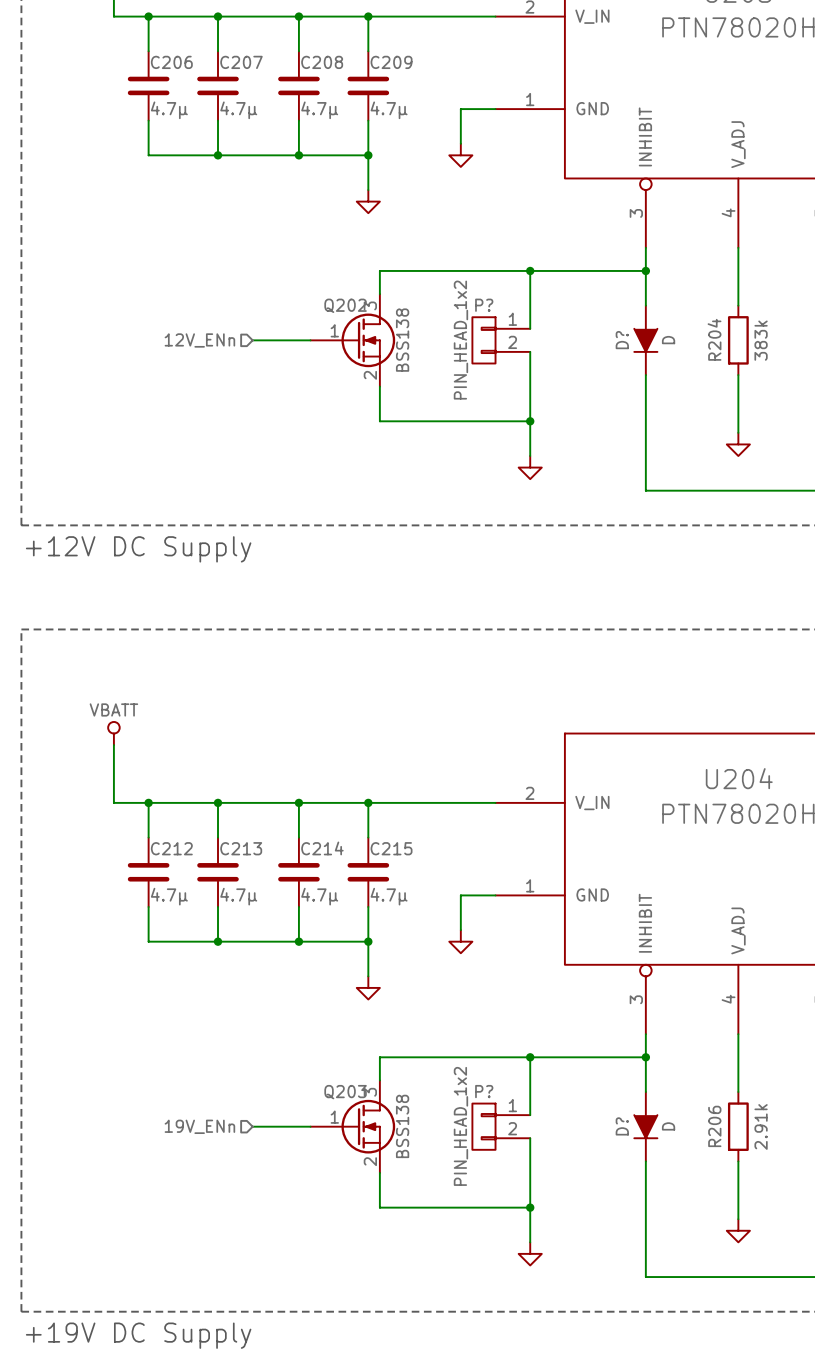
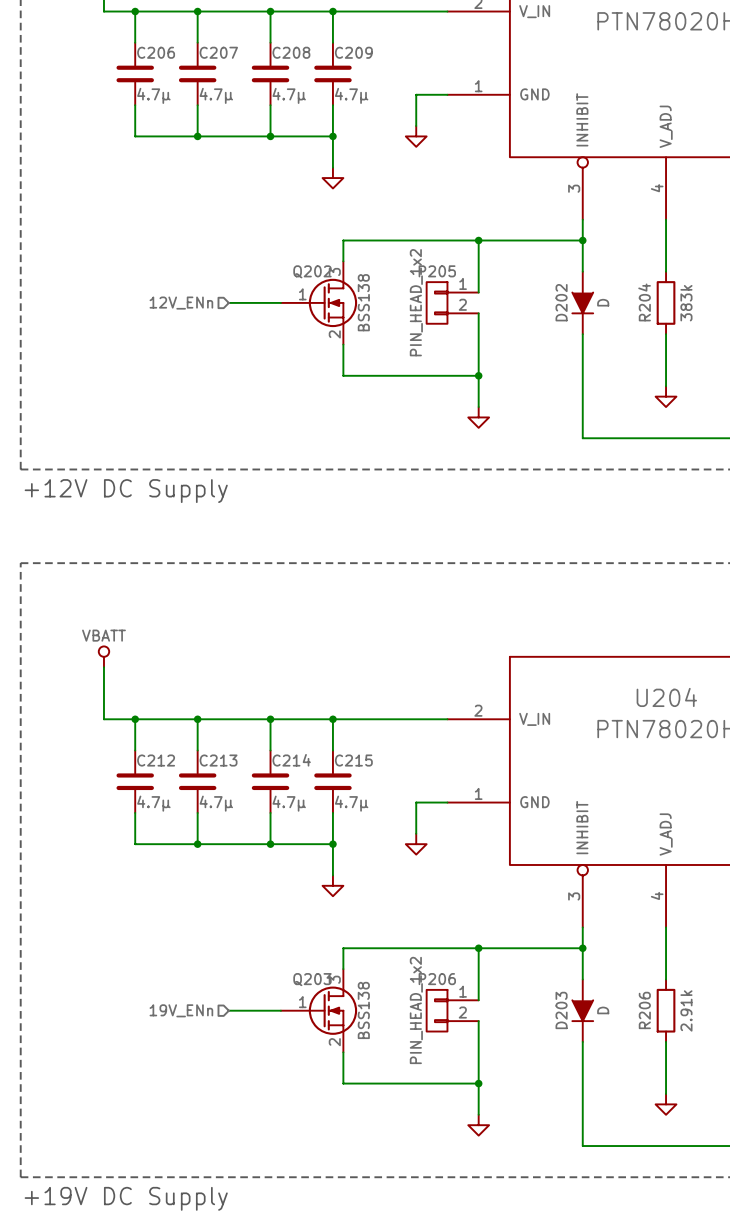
P? name: P? (484, 305) -> P205 (437, 271)
D? name: D? (622, 340) -> D202 (561, 302)
P? name: P? (484, 1091) -> P206 (437, 979)
D? name: D? (622, 1126) -> D203 (561, 1010)

